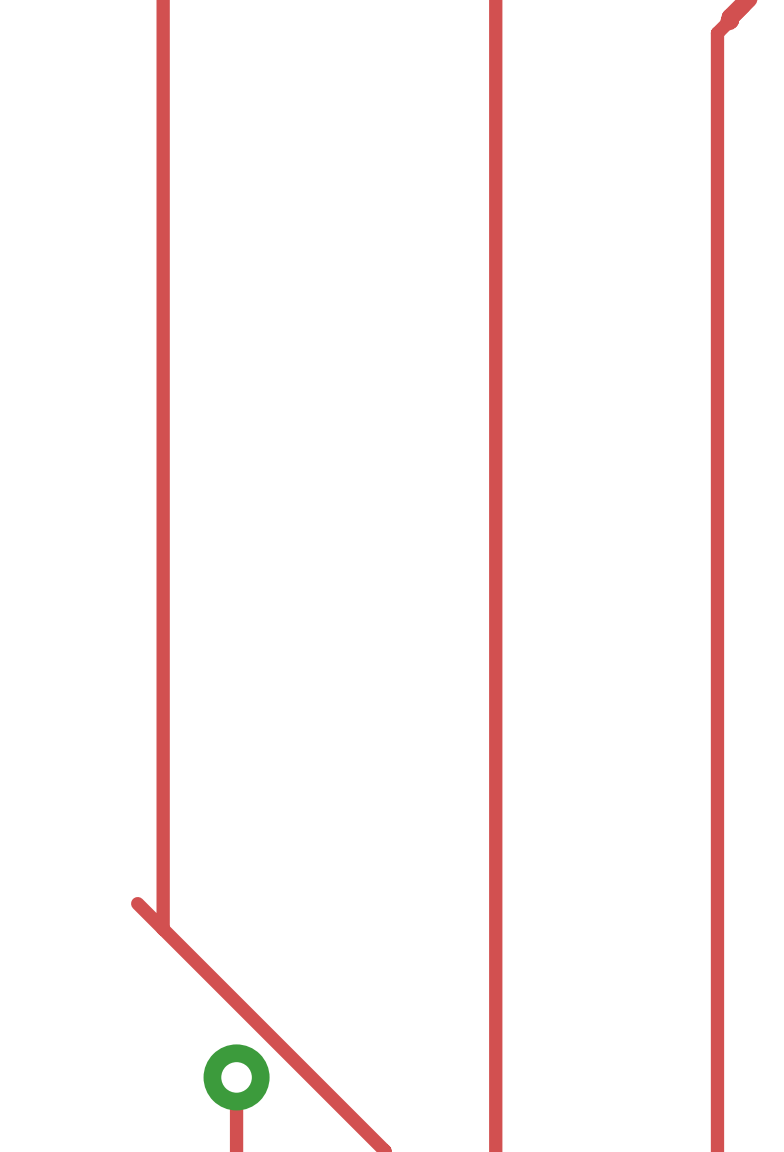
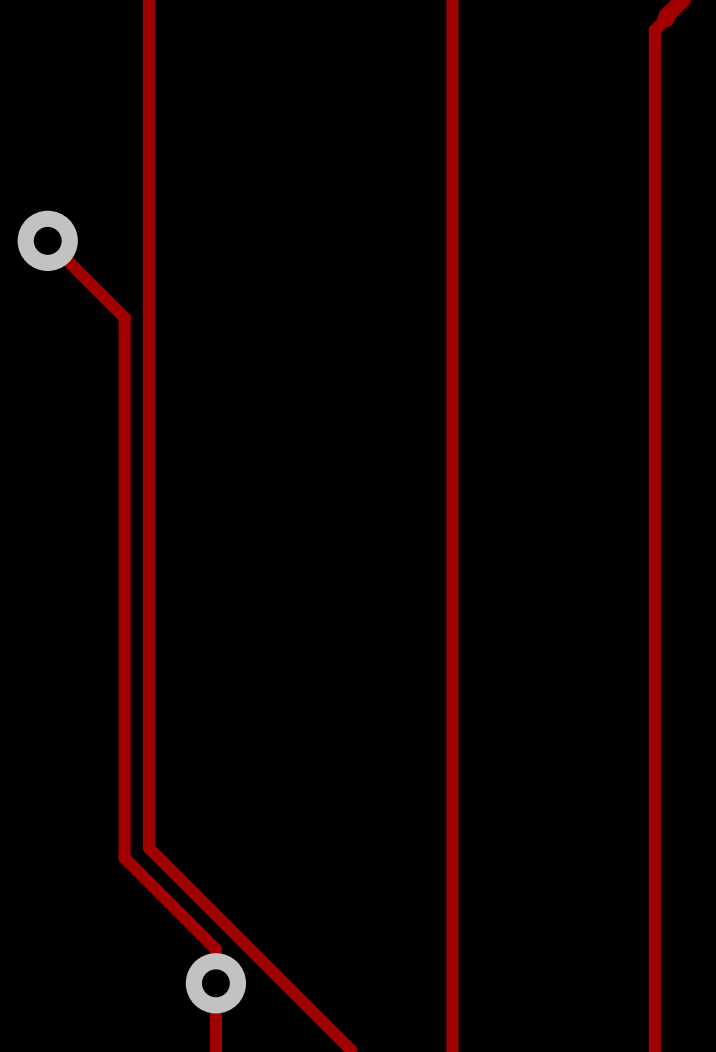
track: none -> (47, 240) (124, 317) (124, 858) (215, 949) (215, 983)
via: none -> (47, 240)
track: (137, 903) (163, 929) -> none

